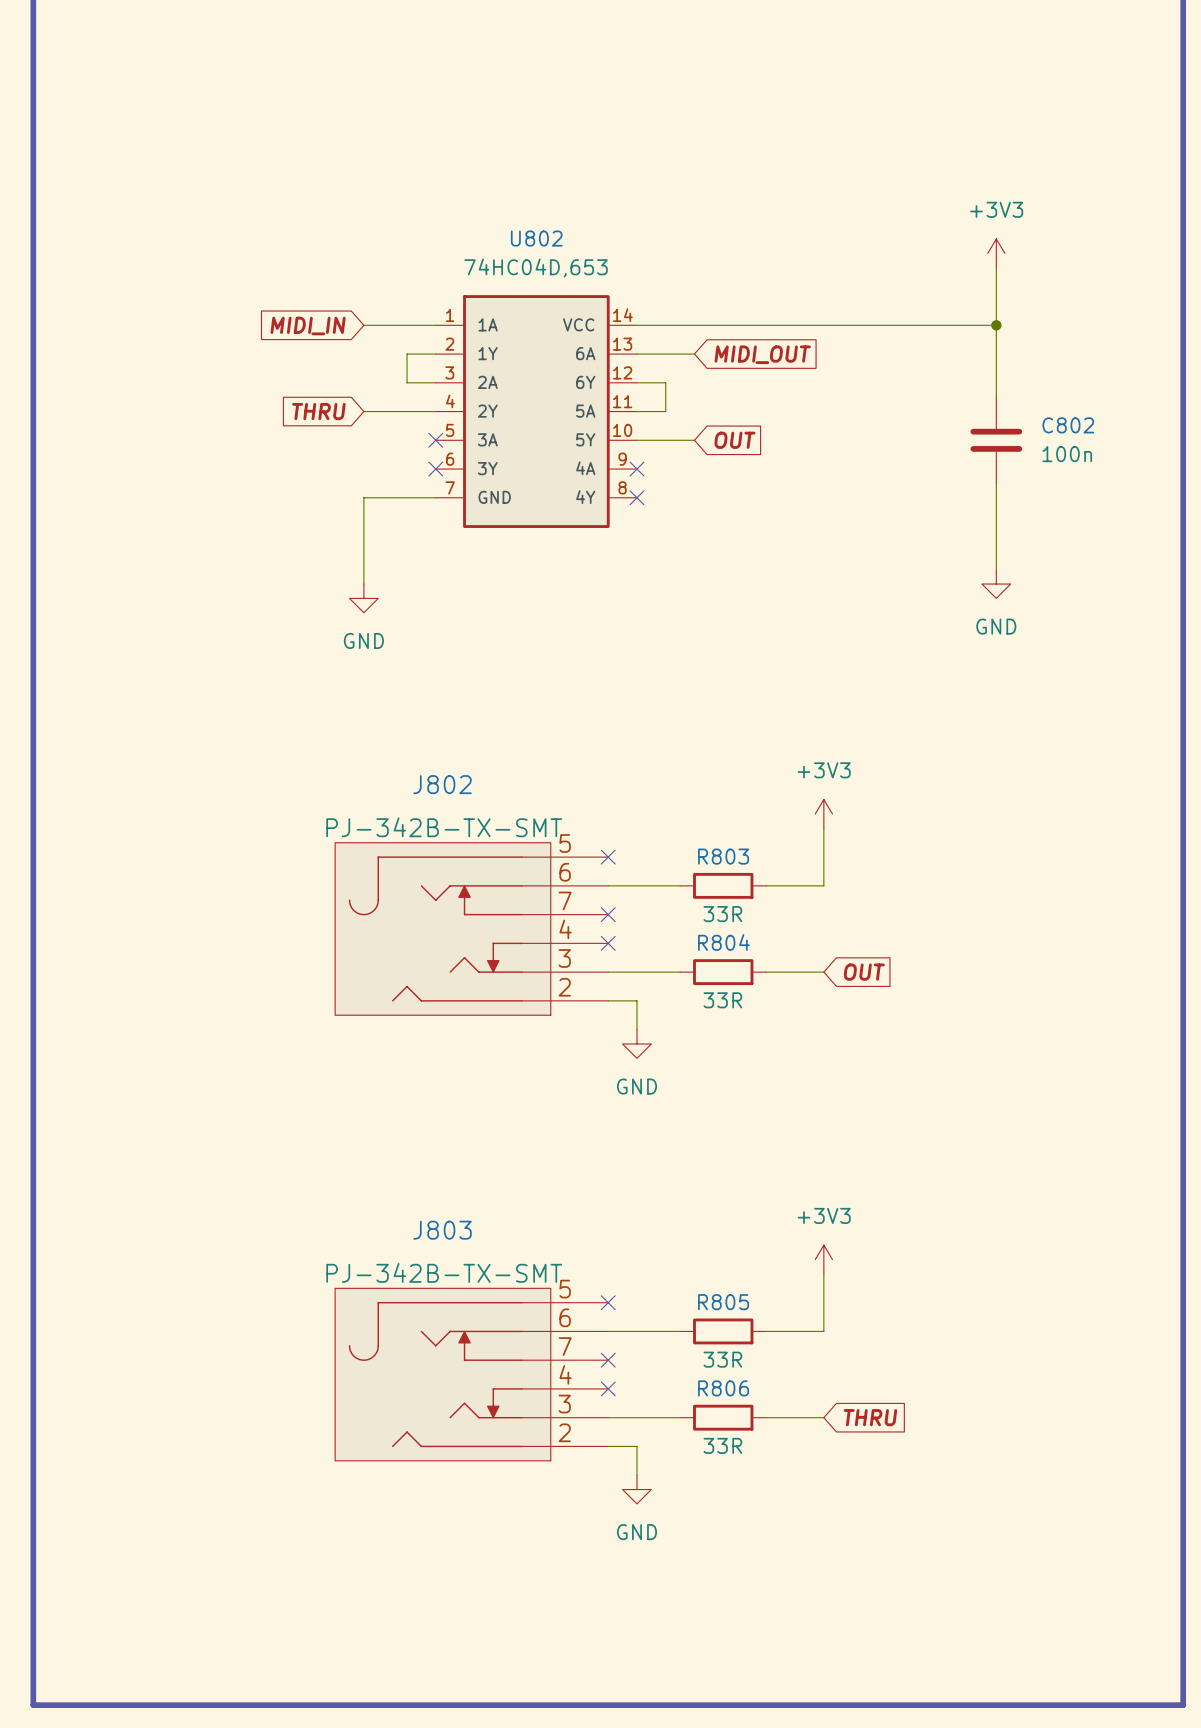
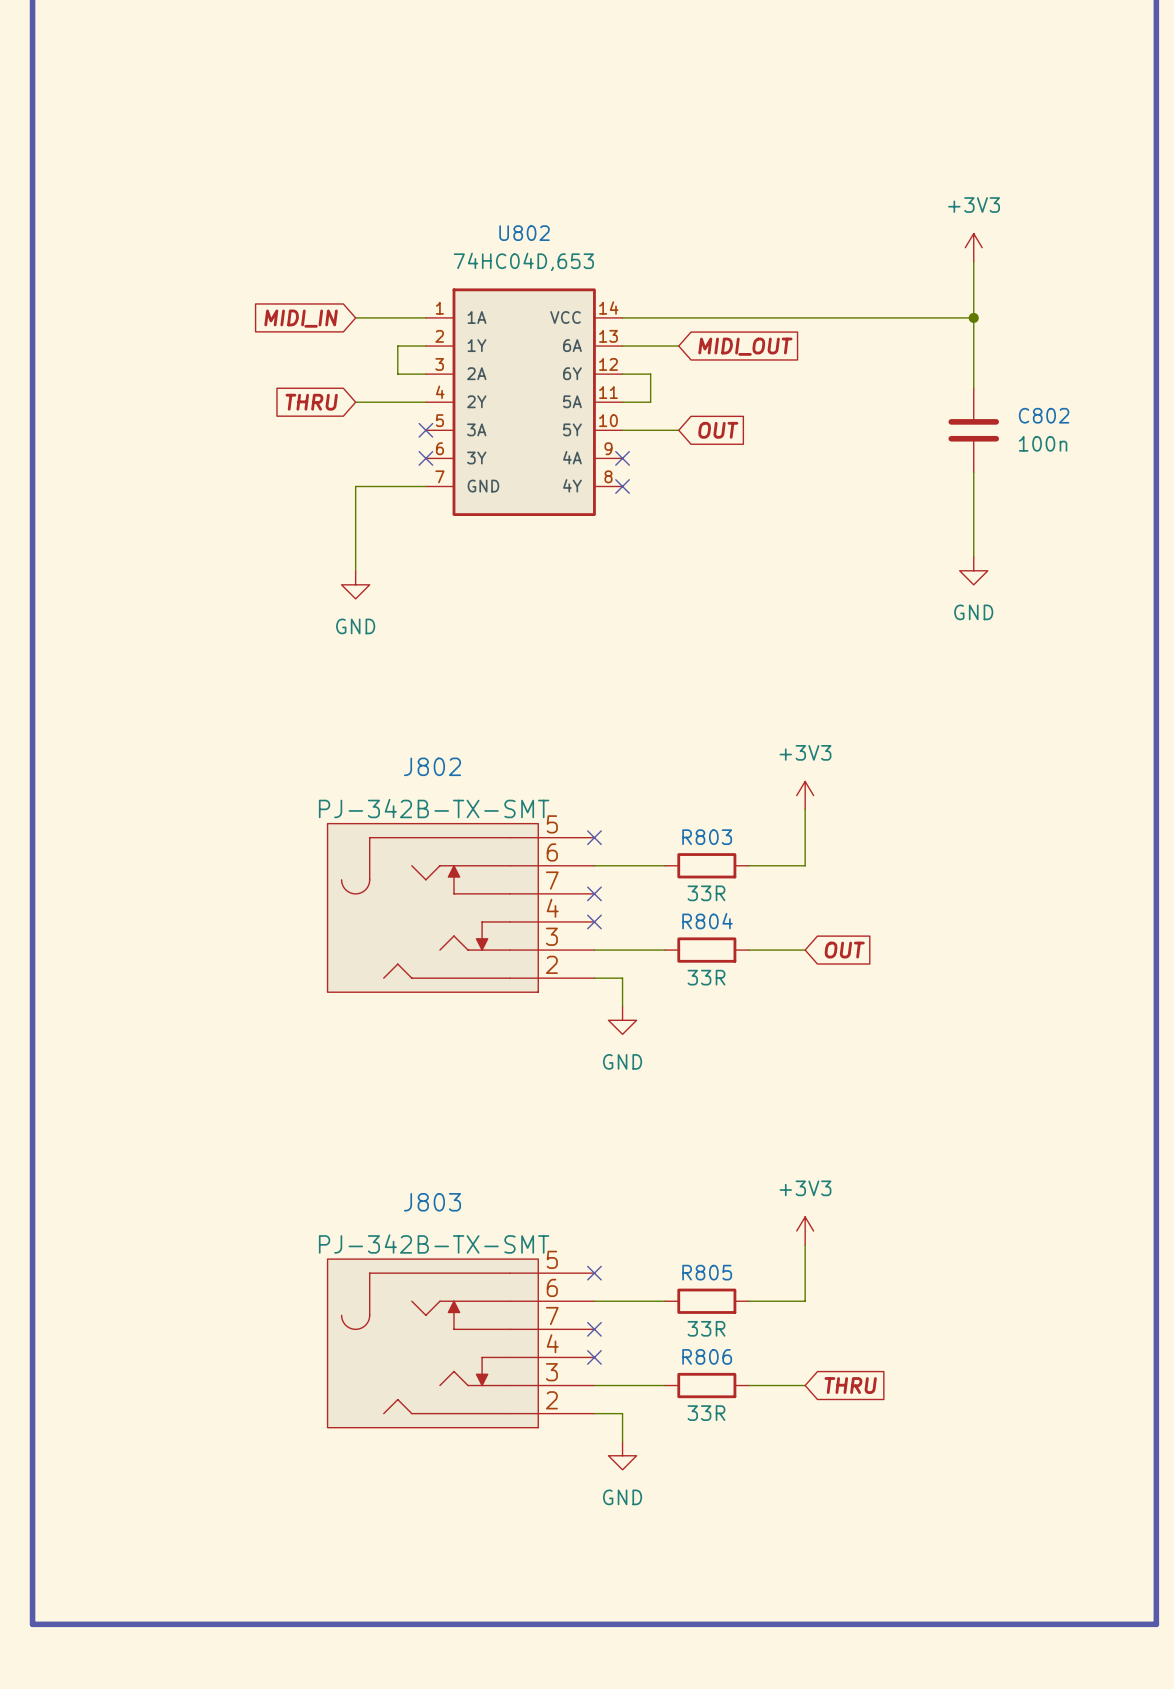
line: (33, 1662) (33, 1705) (1183, 1705) (1183, 1662) -> (32, 1624) (1156, 1624)

